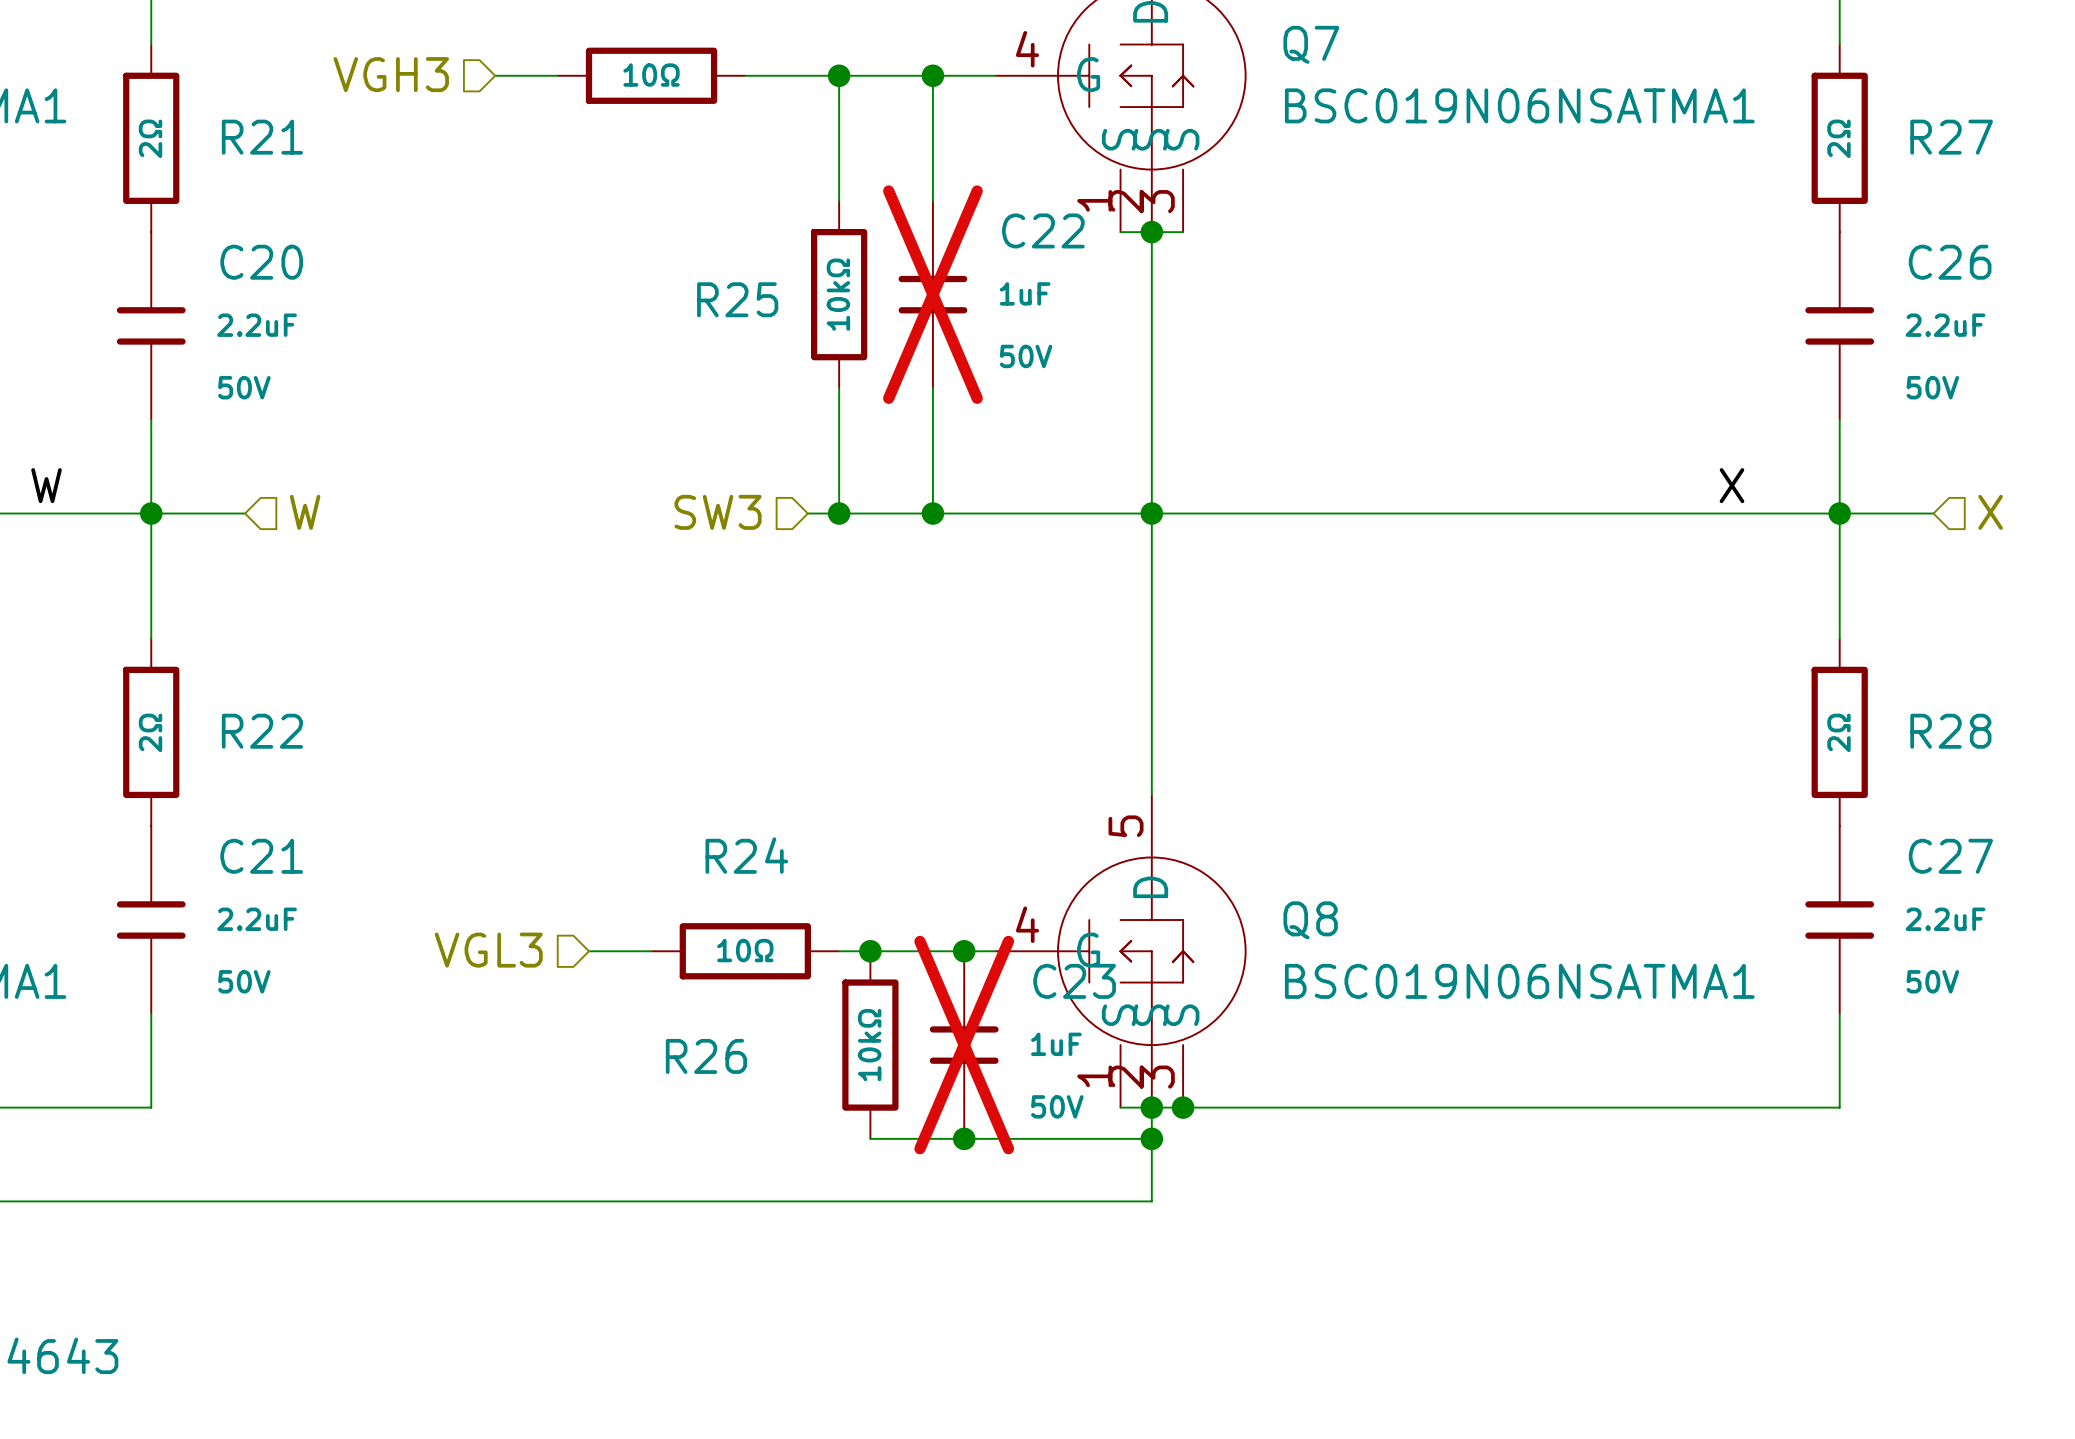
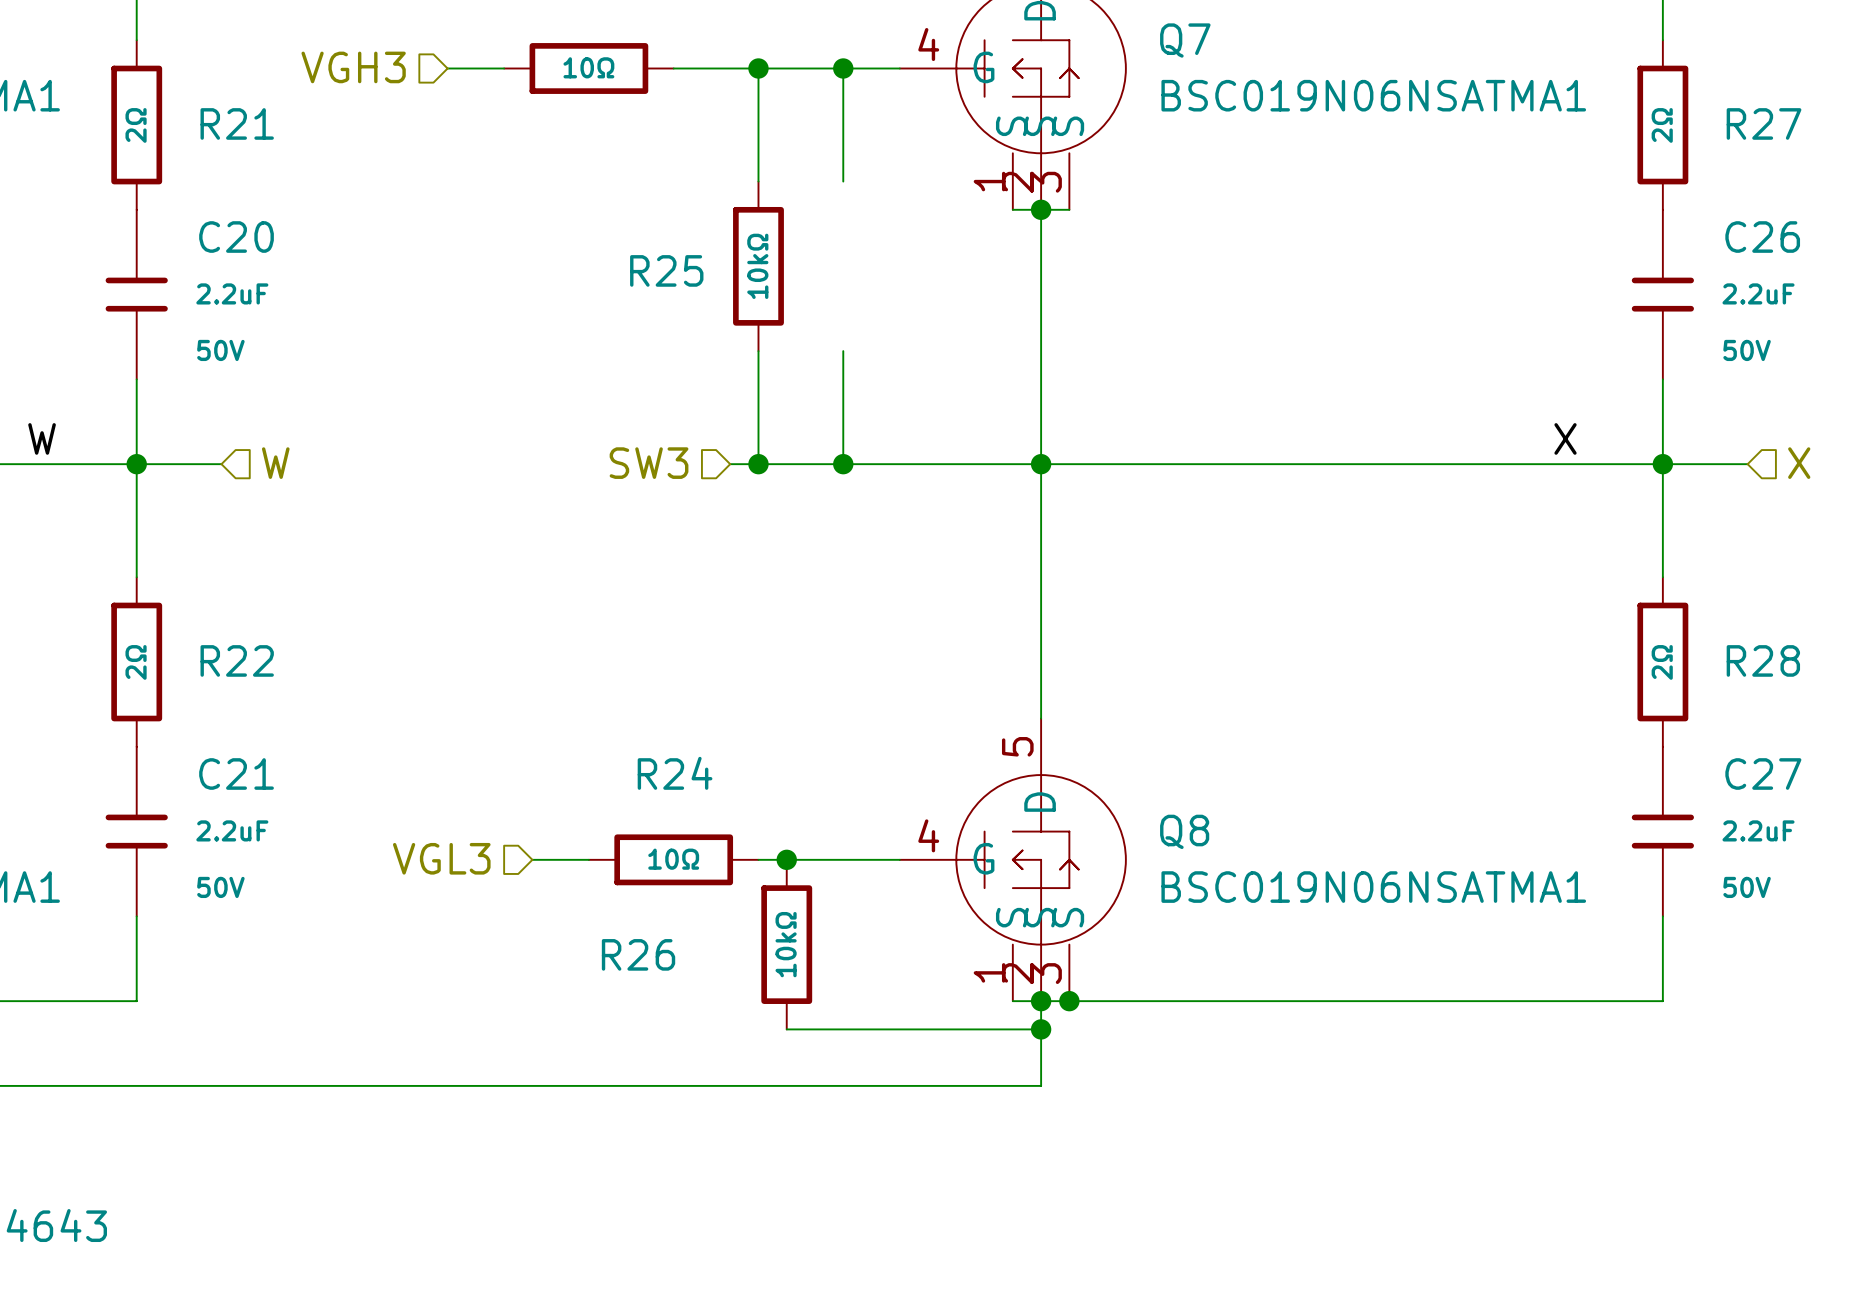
C22: 1uF (932, 294) -> none
junction: (964, 951) -> none
C23: 1uF (964, 1045) -> none
junction: (964, 1138) -> none

